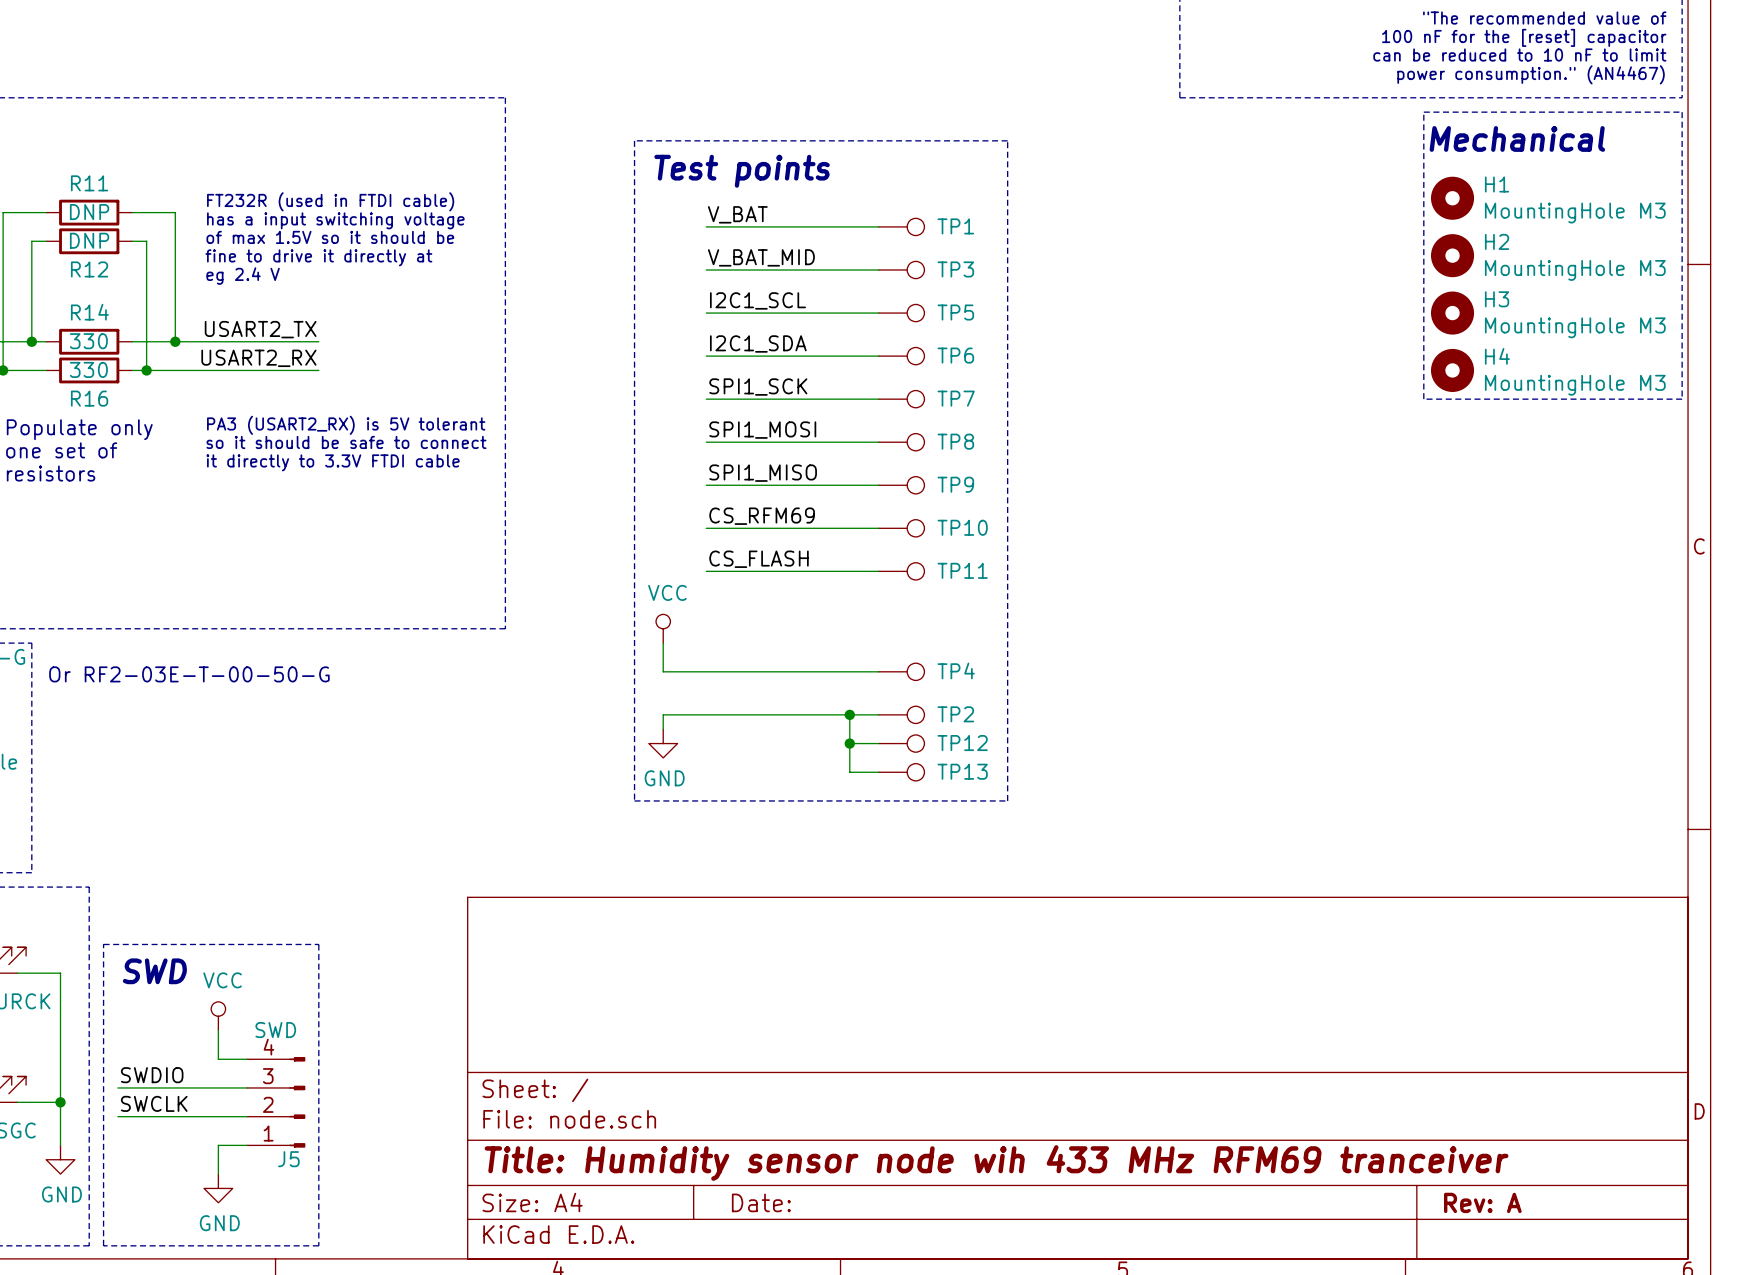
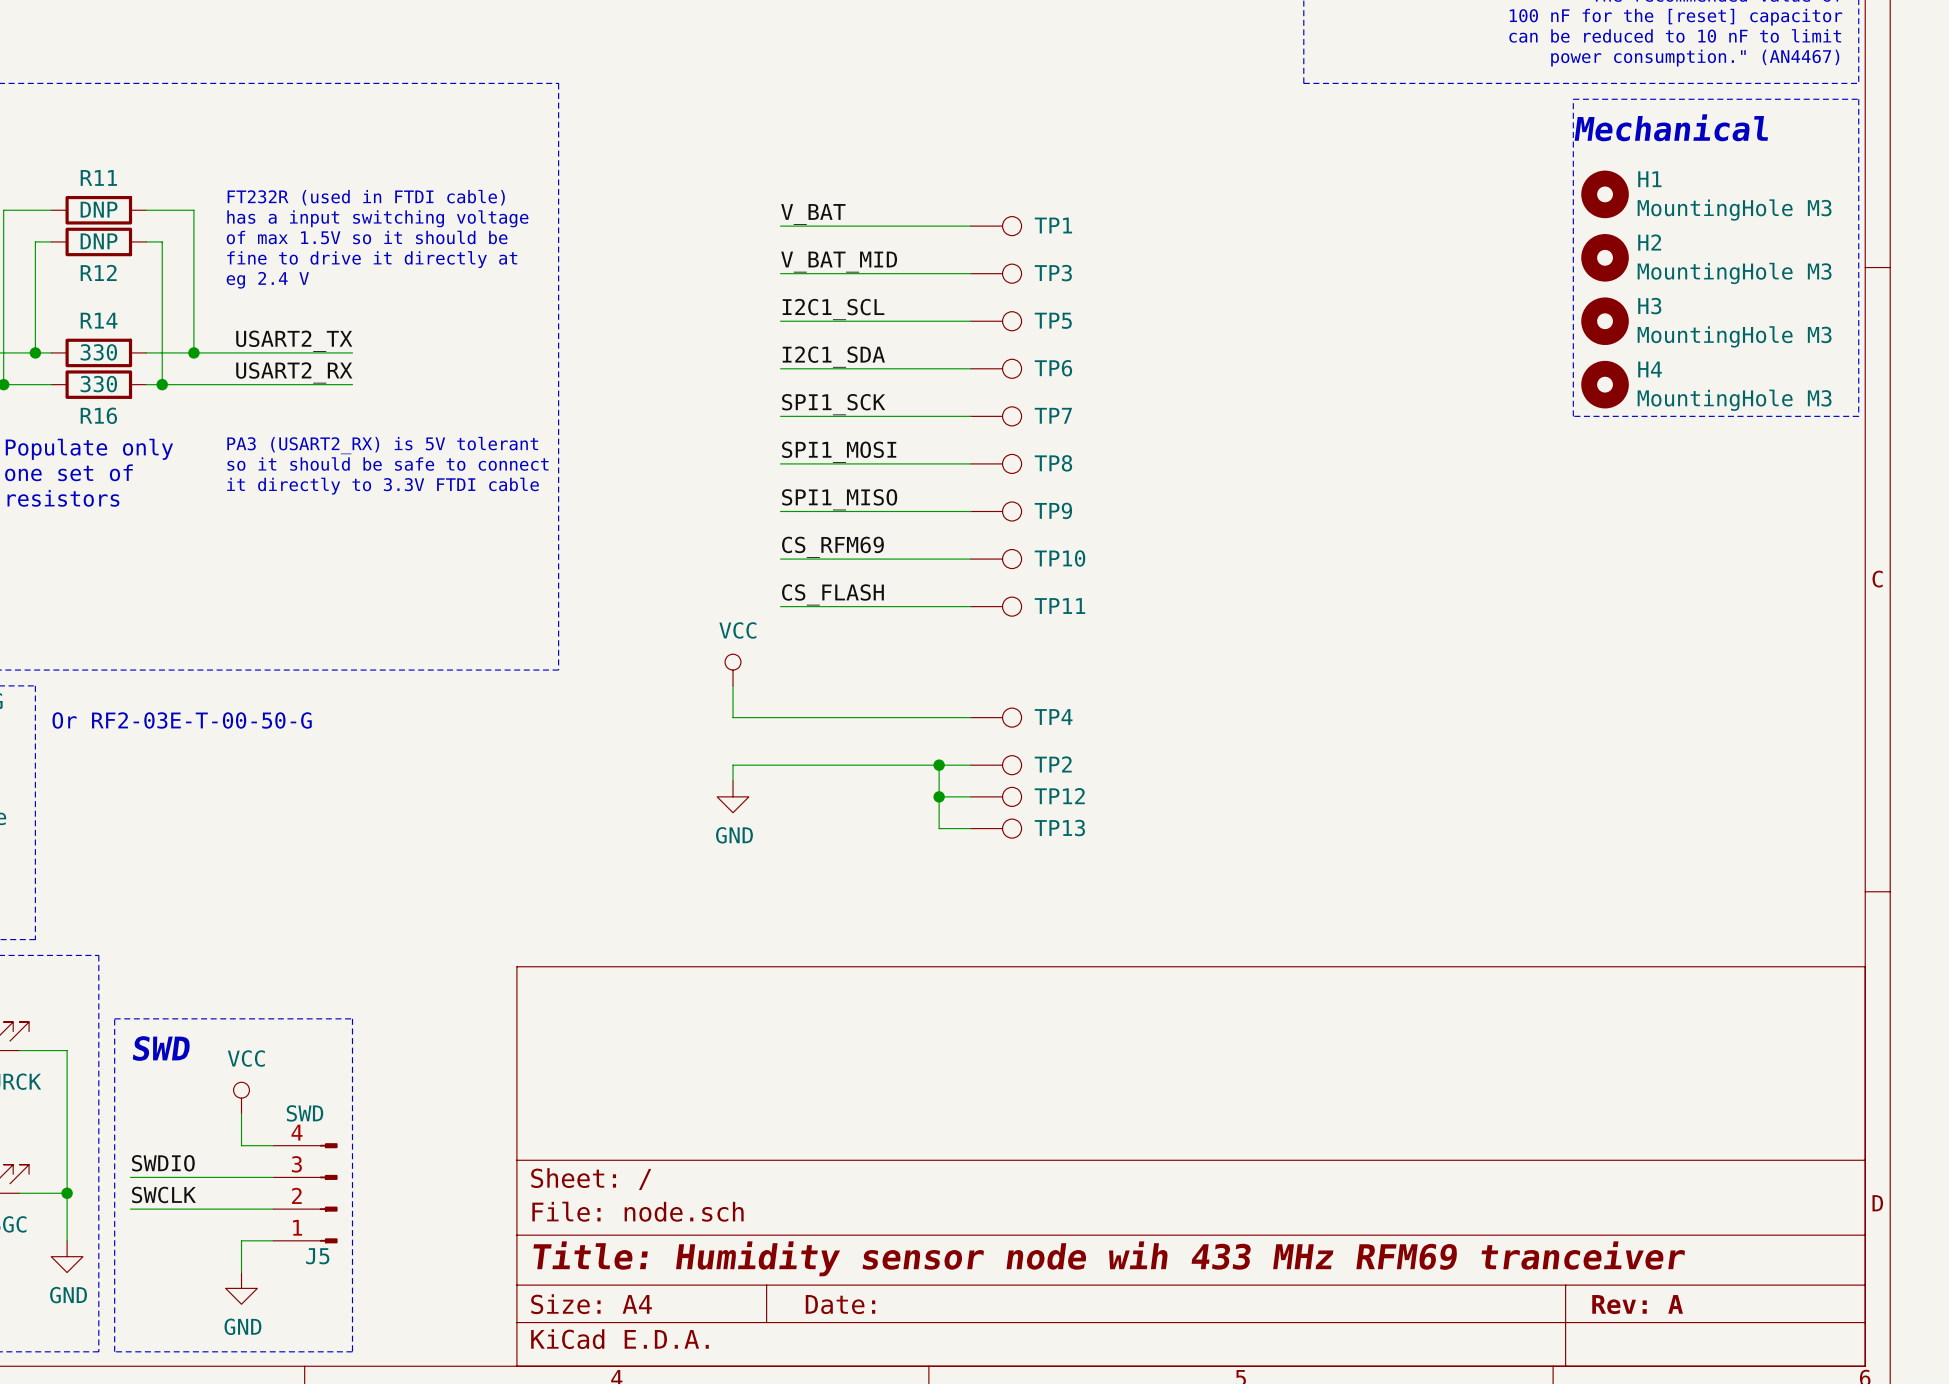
line: (634, 140) (1007, 140) (1007, 800) (634, 800) (634, 140) -> none
text: Test points (742, 171) -> none

